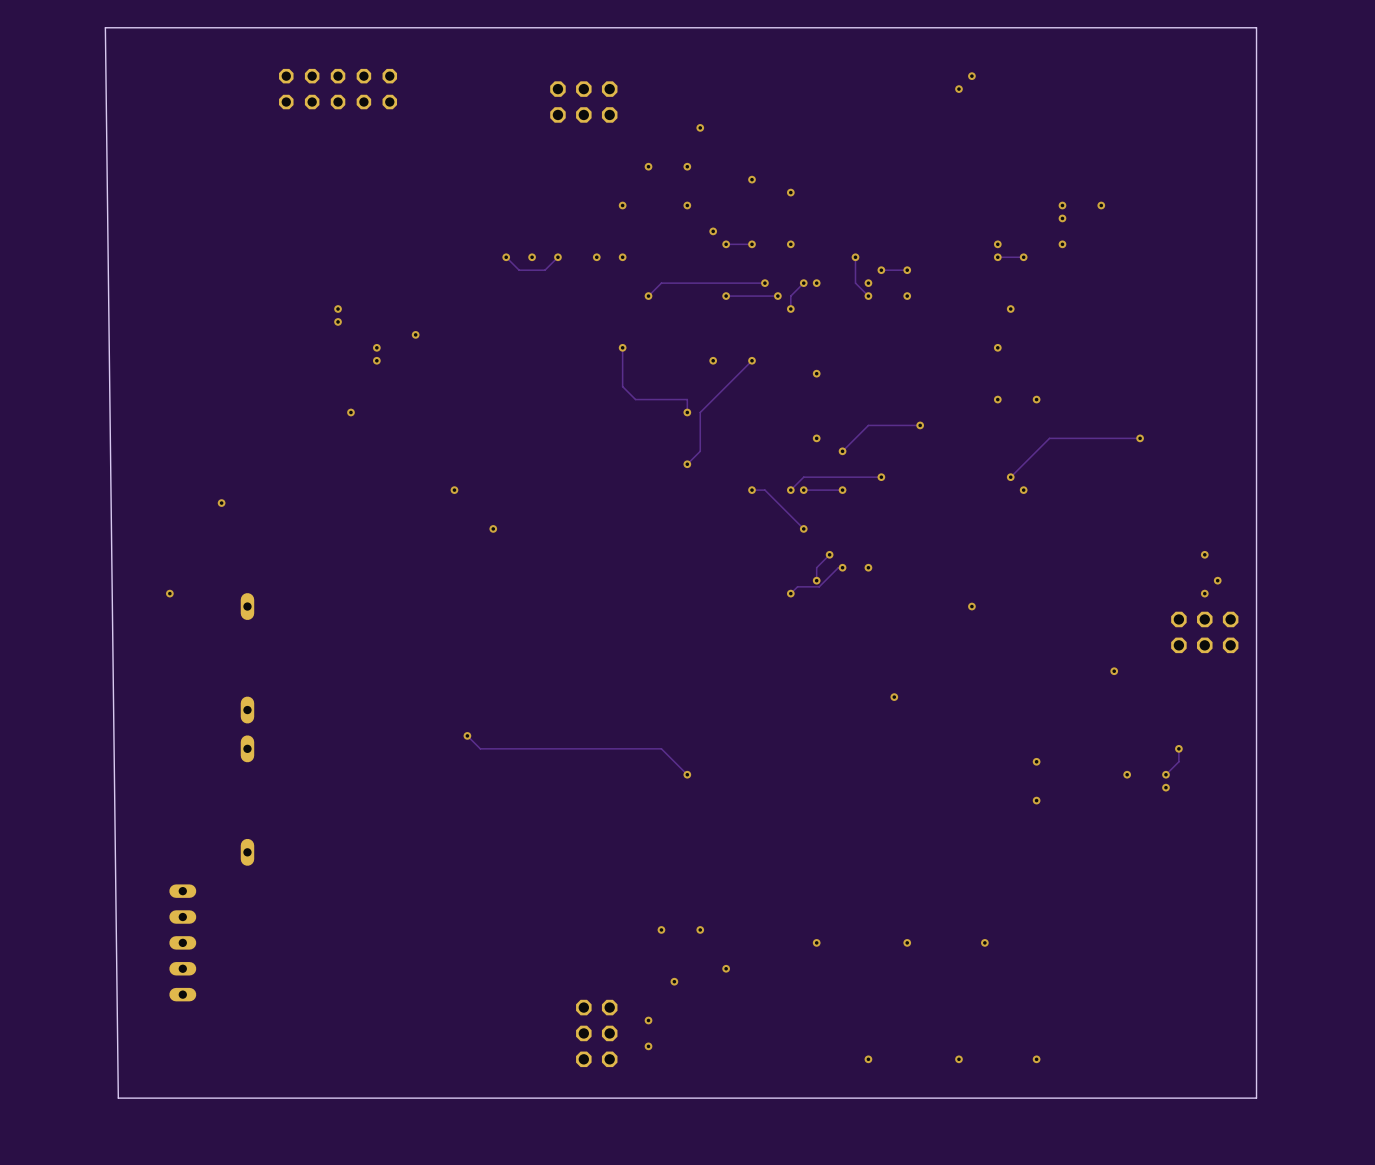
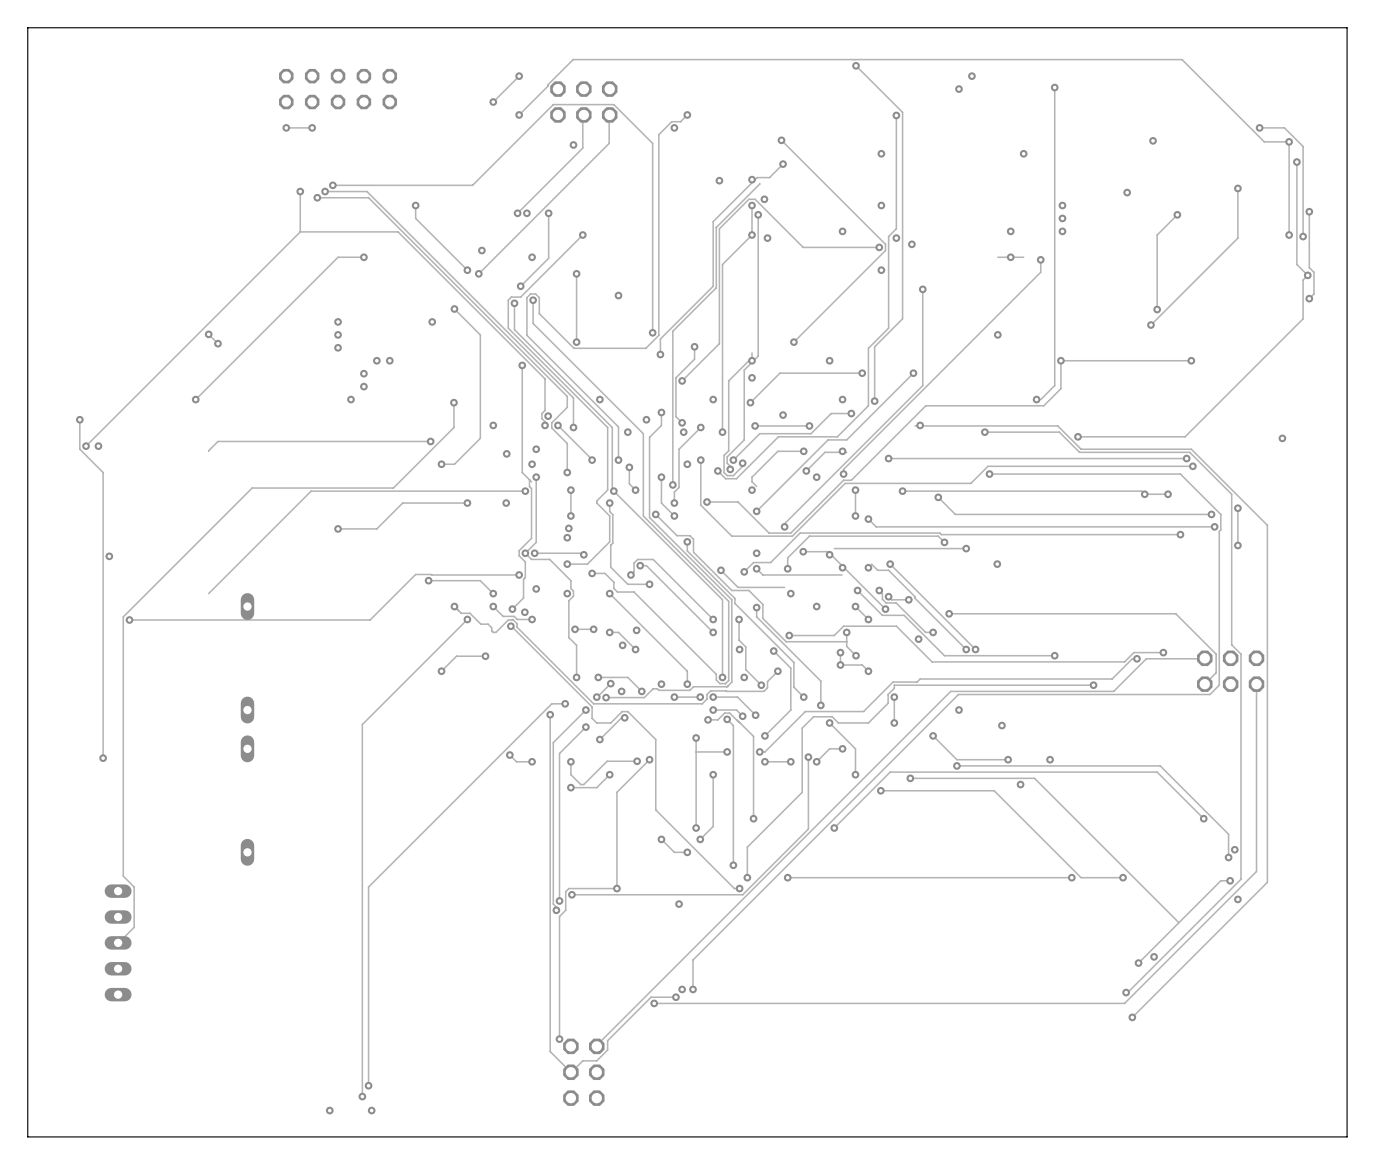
board edge: (1256, 27) (1256, 1098) (118, 1098) (105, 27) -> (1256, 27) (1347, 27) (1347, 1136) (27, 1136) (27, 27) (105, 27)
track: none -> (856, 65) (902, 112) (902, 318) (874, 346) (874, 401)
via: none -> (856, 65)
track: none -> (519, 76) (493, 102)
via: none -> (519, 76)
track: none -> (1054, 87) (1054, 385) (1040, 399)
via: none -> (1054, 87)
via: none -> (493, 102)
track: none -> (519, 114) (573, 59) (1182, 59) (1264, 141) (1289, 141) (1289, 235)
via: none -> (519, 114)
track: none -> (583, 114) (582, 148) (517, 213)
track: none -> (609, 114) (609, 143) (478, 273)
track: none -> (687, 114) (680, 121) (671, 121) (658, 134) (658, 335) (645, 348) (574, 348) (539, 313) (539, 297) (535, 294) (530, 294) (526, 297) (526, 335) (618, 426) (618, 460)
via: none -> (687, 114)
track: none -> (896, 115) (896, 228) (888, 236) (888, 328) (868, 348) (868, 405) (837, 436) (778, 436) (736, 478) (725, 478) (717, 470)
via: none -> (896, 115)
via: none -> (286, 127)
track: none -> (312, 127) (286, 127)
via: none -> (312, 127)
via: none -> (674, 127)
via: (700, 127) -> none
track: none -> (1259, 127) (1284, 127) (1303, 146) (1303, 236)
via: none -> (1259, 127)
track: none -> (781, 140) (885, 244) (885, 250) (793, 342)
via: none -> (781, 140)
via: none -> (1153, 140)
via: none -> (1289, 141)
via: none -> (573, 144)
via: none -> (881, 153)
via: none -> (1023, 153)
track: none -> (1296, 162) (1296, 264) (1307, 275) (1303, 280) (1303, 318) (1185, 436) (1078, 436)
via: none -> (1296, 162)
track: none -> (783, 164) (769, 177) (757, 177) (713, 221) (713, 286) (660, 339) (660, 354)
via: none -> (783, 164)
via: (648, 166) -> none
via: (687, 166) -> none
via: none -> (719, 180)
track: none -> (759, 183) (716, 227)
track: none -> (332, 185) (472, 185) (553, 104) (613, 104) (652, 143) (652, 332)
via: none -> (332, 185)
track: none -> (1237, 188) (1237, 238) (1150, 325)
via: none -> (1237, 188)
track: none -> (300, 191) (300, 231)
via: none -> (300, 191)
track: none -> (325, 191) (367, 191) (573, 398) (573, 427)
via: none -> (325, 191)
via: (790, 192) -> none
via: none -> (1127, 192)
track: none -> (317, 197) (368, 197) (567, 396) (567, 407) (551, 422) (551, 427) (567, 443) (567, 472)
via: none -> (317, 197)
via: none -> (764, 199)
track: none -> (415, 205) (415, 218) (467, 270)
via: none -> (415, 205)
via: (622, 205) -> none
via: (687, 205) -> none
track: none -> (752, 205) (752, 235) (722, 264) (722, 432)
via: none -> (752, 205)
via: none -> (881, 205)
via: (1101, 205) -> none
track: none -> (1309, 211) (1309, 267) (1313, 272) (1313, 294) (1309, 298)
via: none -> (1309, 211)
via: none -> (517, 213)
via: none -> (526, 213)
track: none -> (548, 213) (548, 258) (520, 286)
via: none -> (548, 213)
track: none -> (758, 214) (758, 356) (744, 370) (744, 439) (727, 456) (727, 463) (730, 469)
via: none -> (758, 214)
track: none -> (1177, 214) (1157, 235) (1157, 309)
via: none -> (1177, 214)
track: none -> (716, 227) (716, 287) (672, 331) (672, 484)
track: none -> (300, 231) (86, 446)
track: none -> (300, 231) (398, 231) (545, 378) (545, 410) (541, 413) (545, 425)
via: (713, 231) -> none
via: none -> (842, 231)
via: none -> (1010, 231)
track: none -> (582, 235) (520, 297) (511, 297) (508, 300) (508, 328) (607, 427) (607, 490) (596, 503) (609, 515) (609, 541) (587, 564) (567, 564)
via: none -> (582, 235)
via: none -> (752, 235)
via: none -> (1289, 235)
via: none -> (1303, 236)
via: none -> (767, 238)
via: none -> (896, 238)
via: (726, 244) -> none
track: (752, 244) (726, 244) -> none
via: (752, 244) -> none
via: (790, 244) -> none
via: none -> (911, 244)
via: (997, 244) -> none
via position: (1062, 244) -> (1062, 231)
track: none -> (879, 247) (803, 247) (755, 199) (748, 199) (719, 228) (719, 343) (682, 380)
via: none -> (879, 247)
via: none -> (481, 250)
track: none -> (363, 257) (338, 257) (195, 399)
via: none -> (363, 257)
via: (506, 257) -> none
track: (557, 257) (545, 270) (519, 270) (506, 257) -> none
via: (557, 257) -> none
via: (596, 257) -> none
via: (622, 257) -> none
track: (855, 257) (855, 283) (868, 296) -> none
via: (855, 257) -> none
via: (997, 257) -> none
via: none -> (1010, 257)
via: (1023, 257) -> none
track: none -> (1040, 259) (1040, 272) (843, 469) (843, 474)
via: none -> (1040, 259)
via: none -> (467, 270)
track: (907, 270) (881, 270) -> none
via: (907, 270) -> none
via: none -> (478, 273)
track: none -> (576, 273) (576, 342)
via: none -> (576, 273)
via: none -> (1307, 275)
track: (764, 283) (661, 283) (648, 296) -> none
via: (764, 283) -> none
track: (803, 283) (790, 296) (790, 309) -> none
via: (803, 283) -> none
via: (816, 283) -> none
via: (868, 283) -> none
via: none -> (520, 286)
track: none -> (922, 289) (922, 385) (784, 523) (784, 526)
via: none -> (922, 289)
via: none -> (618, 295)
via: (648, 296) -> none
via: (726, 296) -> none
track: (777, 296) (726, 296) -> none
via: (777, 296) -> none
via: (868, 296) -> none
via: (907, 296) -> none
via: none -> (1309, 298)
track: none -> (533, 300) (533, 323) (643, 433) (643, 515) (728, 601) (728, 680) (725, 683) (719, 683) (716, 679) (716, 674) (633, 592) (617, 592) (613, 588) (613, 582) (605, 573) (592, 573)
via: none -> (533, 300)
track: none -> (514, 303) (514, 329) (612, 427) (612, 489) (722, 599) (722, 677)
via: none -> (514, 303)
via: (338, 309) -> none
track: none -> (454, 309) (480, 334) (480, 438) (454, 464) (441, 464)
via: none -> (454, 309)
via: (790, 309) -> none
via: (1010, 309) -> none
via: none -> (1157, 309)
via: none -> (432, 321)
via: none -> (1150, 325)
via: none -> (652, 332)
track: none -> (208, 334) (217, 343)
via: none -> (208, 334)
via: none -> (338, 334)
via: (415, 334) -> none
via: none -> (576, 342)
via: none -> (793, 342)
via: none -> (217, 343)
track: none -> (694, 346) (694, 359) (675, 377) (675, 416) (682, 422)
via: none -> (694, 346)
via: none -> (338, 347)
via: (376, 347) -> none
track: (622, 347) (622, 386) (635, 399) (687, 399) (687, 412) -> none
via: (622, 347) -> none
via position: (997, 347) -> (997, 334)
track: none -> (752, 352) (752, 357) (728, 380) (728, 450) (724, 455) (724, 472) (727, 475) (733, 475) (742, 466) (742, 463)
via: none -> (660, 354)
via: none -> (389, 360)
via: (713, 360) -> none
track: (752, 360) (700, 412) (700, 451) (687, 464) -> none
via: none -> (829, 360)
via: none -> (1060, 360)
track: none -> (1191, 360) (1060, 360) (1060, 388) (1043, 405) (925, 405) (851, 480) (843, 480) (790, 533) (769, 533) (738, 502) (706, 502)
via: none -> (1191, 360)
track: none -> (522, 365) (522, 472) (531, 481)
via: none -> (522, 365)
via: none -> (363, 373)
via: (816, 373) -> none
track: none -> (862, 373) (779, 373) (750, 402)
via: none -> (862, 373)
track: none -> (913, 373) (846, 439) (828, 439) (756, 511)
via: none -> (913, 373)
via: none -> (752, 377)
via: none -> (682, 380)
via: none -> (363, 386)
via: none -> (195, 399)
via: none -> (599, 399)
via: none -> (713, 399)
via: none -> (842, 399)
via: (997, 399) -> none
via: none -> (874, 401)
track: none -> (453, 402) (453, 427) (393, 488) (252, 488) (123, 616) (123, 876) (134, 887) (134, 927) (118, 942)
via: none -> (453, 402)
via: none -> (750, 402)
via position: (350, 412) -> (350, 399)
track: none -> (661, 412) (661, 425) (649, 437) (649, 517) (731, 599) (731, 682) (727, 686)
via: none -> (661, 412)
via: (687, 412) -> none
track: none -> (851, 413) (831, 413) (810, 433) (759, 433) (733, 460)
via: none -> (851, 413)
via: none -> (783, 415)
via: none -> (548, 416)
track: none -> (79, 419) (79, 449) (103, 472) (103, 758)
via: none -> (79, 419)
via: none -> (646, 419)
via: none -> (682, 422)
via: none -> (493, 425)
via: none -> (545, 425)
track: none -> (557, 425) (592, 460)
via: none -> (557, 425)
via: none -> (755, 425)
track: none -> (809, 425) (755, 425)
via: none -> (809, 425)
track: none -> (915, 425) (1057, 425) (1081, 449) (1191, 449) (1267, 525) (1267, 882) (1132, 1017)
track: (920, 425) (868, 425) (842, 451) -> none
via: none -> (573, 427)
track: none -> (700, 427) (679, 449) (679, 487) (674, 492) (674, 503)
via: none -> (700, 427)
via: none -> (627, 432)
via: none -> (683, 432)
via: none -> (722, 432)
track: none -> (984, 432) (1059, 432) (1079, 452) (1189, 452) (1231, 494) (1231, 644) (1241, 654) (1241, 879) (1126, 992)
via: none -> (984, 432)
via: none -> (1078, 436)
via: (816, 438) -> none
track: (1140, 438) (1049, 438) (1010, 477) -> none
via: (1140, 438) -> none
via: none -> (1282, 438)
track: none -> (430, 441) (217, 441) (208, 451)
via: none -> (430, 441)
via: none -> (86, 446)
via: none -> (98, 446)
via: none -> (536, 449)
track: none -> (803, 451) (777, 451) (752, 477) (752, 481) (756, 486)
via: none -> (803, 451)
track: none -> (846, 452) (824, 452) (806, 470)
via: none -> (506, 453)
via: none -> (888, 458)
track: none -> (1186, 458) (888, 458)
via: none -> (1186, 458)
via: none -> (592, 460)
via: none -> (618, 460)
track: none -> (700, 460) (700, 505) (731, 536) (792, 536) (845, 483) (970, 483) (987, 466) (1192, 466)
via: none -> (700, 460)
via: none -> (733, 460)
via: none -> (742, 463)
via: none -> (441, 464)
via: none -> (532, 464)
via: none -> (1192, 466)
track: none -> (629, 467) (629, 483) (635, 490)
via: none -> (629, 467)
via: none -> (730, 469)
via: none -> (717, 470)
via: none -> (806, 470)
via: none -> (567, 472)
via: none -> (843, 474)
track: none -> (989, 474) (1180, 474) (1220, 514) (1219, 685) (1209, 694) (958, 694) (693, 959) (693, 989)
via: none -> (989, 474)
track: none -> (536, 477) (536, 542) (525, 553) (531, 559) (549, 559) (570, 580) (573, 596) (568, 600) (568, 637) (576, 645) (576, 677)
via: none -> (536, 477)
track: none -> (661, 477) (661, 503) (674, 515)
via: none -> (661, 477)
via: none -> (816, 477)
track: (881, 477) (803, 477) (790, 490) -> none
via: (881, 477) -> none
via: (1010, 477) -> none
track: none -> (529, 479) (529, 486) (531, 488) (531, 538) (519, 550) (519, 555) (525, 561) (523, 598) (512, 609)
via: none -> (672, 484)
via: (454, 490) -> none
track: none -> (570, 490) (570, 515)
via: none -> (570, 490)
via: none -> (635, 490)
track: (752, 490) (764, 490) (803, 528) -> none
via: (790, 490) -> none
via: (803, 490) -> none
track: (842, 490) (803, 490) -> none
via: (842, 490) -> none
track: none -> (855, 490) (855, 515)
via: none -> (855, 490)
via: (1023, 490) -> none
track: none -> (525, 491) (311, 491) (208, 593)
via: none -> (525, 491)
via: none -> (613, 491)
track: none -> (902, 491) (1141, 491) (1144, 494) (1168, 494)
via: none -> (902, 491)
via: none -> (1144, 494)
via: none -> (1168, 494)
track: none -> (938, 497) (955, 514) (1211, 514)
via: none -> (938, 497)
via: none -> (706, 502)
via: (221, 503) -> none
track: none -> (467, 503) (402, 503) (376, 528) (338, 528)
via: none -> (467, 503)
via: none -> (506, 503)
track: none -> (609, 503) (609, 511) (612, 514) (610, 567) (627, 584) (649, 584)
via: none -> (609, 503)
via: none -> (674, 503)
track: none -> (1237, 508) (1237, 545)
via: none -> (1237, 508)
via: none -> (756, 511)
track: none -> (655, 514) (677, 535) (689, 535) (693, 539) (693, 552) (731, 590) (748, 590) (762, 604) (762, 618) (786, 641) (846, 641)
via: none -> (655, 514)
via: none -> (1211, 514)
via: none -> (570, 515)
via: none -> (674, 515)
via: none -> (855, 515)
track: none -> (868, 519) (876, 526) (1214, 526)
via: none -> (868, 519)
via: none -> (784, 526)
via: none -> (1214, 526)
via: none -> (338, 528)
via: (493, 528) -> none
via: none -> (568, 528)
via: (803, 528) -> none
track: none -> (1180, 534) (800, 533) (770, 562) (753, 562) (744, 571)
via: none -> (1180, 534)
via: none -> (567, 537)
track: none -> (687, 541) (687, 550) (734, 598) (734, 603) (793, 662) (793, 687) (803, 697)
via: none -> (687, 541)
track: none -> (944, 542) (938, 536) (809, 536) (787, 557) (787, 568)
via: none -> (944, 542)
via: none -> (1237, 545)
track: none -> (966, 548) (834, 548)
via: none -> (966, 548)
track: none -> (803, 551) (828, 551) (885, 609)
via: none -> (803, 551)
via: none -> (525, 553)
track: none -> (534, 553) (582, 553) (583, 554)
via: none -> (534, 553)
via: none -> (756, 553)
via: none -> (583, 554)
track: (829, 554) (816, 567) (816, 580) -> none
via: (1204, 554) -> none
via: none -> (109, 556)
via: none -> (567, 564)
track: none -> (871, 564) (877, 570) (888, 570) (966, 649)
track: none -> (890, 564) (975, 649)
via: none -> (890, 564)
via: none -> (997, 564)
track: none -> (640, 565) (646, 565) (713, 632)
via: none -> (640, 565)
track: (842, 567) (838, 567) (819, 586) (797, 586) (790, 593) -> none
track: none -> (756, 568) (762, 574) (842, 574)
via: none -> (756, 568)
via: none -> (787, 568)
track: none -> (720, 570) (738, 587) (784, 587)
via: none -> (720, 570)
via: none -> (744, 571)
via: none -> (592, 573)
track: none -> (519, 574) (415, 574) (370, 619) (129, 619)
via: none -> (519, 574)
track: none -> (630, 574) (634, 571) (634, 563) (637, 559) (653, 559) (713, 619)
via: none -> (630, 574)
track: none -> (428, 580) (480, 580) (493, 593)
via: none -> (428, 580)
via: (816, 580) -> none
via: (1217, 580) -> none
via: none -> (649, 584)
via: none -> (536, 588)
track: none -> (857, 590) (882, 615) (904, 615) (944, 655) (1054, 655)
via: none -> (857, 590)
track: none -> (879, 590) (886, 602) (896, 602) (925, 632) (933, 632)
via: none -> (879, 590)
via: (169, 593) -> none
via: none -> (493, 593)
via: none -> (567, 593)
track: none -> (609, 593) (687, 671) (687, 684)
via: none -> (609, 593)
via: (1204, 593) -> none
track: none -> (888, 596) (891, 599) (908, 599)
via: none -> (888, 596)
via: none -> (908, 599)
track: none -> (454, 606) (461, 613) (469, 613) (480, 624) (488, 624) (493, 632) (495, 632) (508, 620) (512, 619) (517, 623) (517, 627) (593, 703) (702, 703) (710, 690) (763, 691) (767, 687) (767, 681) (777, 671)
via: none -> (454, 606)
track: none -> (493, 606) (503, 616) (514, 616) (517, 619) (532, 619)
via: none -> (493, 606)
via: none -> (816, 606)
track: none -> (855, 606) (868, 619)
via: none -> (855, 606)
via: (971, 606) -> none
track: none -> (756, 607) (756, 616) (820, 681) (820, 705)
via: none -> (756, 607)
via: none -> (512, 609)
via: none -> (885, 609)
via: none -> (524, 612)
track: none -> (949, 613) (1175, 613) (1216, 654) (1216, 672) (1204, 684)
via: none -> (949, 613)
via: none -> (129, 619)
track: none -> (467, 619) (362, 724) (362, 1096)
via: none -> (467, 619)
via: none -> (532, 619)
via: none -> (713, 619)
track: none -> (739, 619) (739, 640) (745, 646) (745, 669) (761, 685)
via: none -> (739, 619)
via: none -> (868, 619)
track: none -> (510, 626) (592, 706) (592, 718) (596, 722) (610, 722) (622, 711) (627, 711) (655, 739) (655, 809) (734, 888) (739, 888)
via: none -> (510, 626)
via: none -> (575, 629)
track: none -> (593, 629) (575, 629)
via: none -> (593, 629)
via: none -> (636, 630)
track: none -> (609, 632) (618, 632) (635, 649)
via: none -> (609, 632)
via: none -> (713, 632)
track: none -> (846, 632) (846, 646) (856, 655)
via: none -> (846, 632)
via: none -> (933, 632)
part position: (1204, 632) -> (1230, 671)
track: none -> (789, 635) (834, 635) (843, 626) (896, 626) (932, 661) (1124, 661) (1133, 652) (1163, 652)
via: none -> (789, 635)
via: none -> (918, 639)
via: none -> (622, 645)
via: none -> (635, 649)
via: none -> (739, 649)
via: none -> (966, 649)
via: none -> (975, 649)
track: none -> (773, 651) (790, 668) (790, 710) (764, 735)
via: none -> (773, 651)
track: none -> (840, 652) (840, 665) (862, 665) (868, 671)
via: none -> (840, 652)
via: none -> (1163, 652)
via: none -> (856, 655)
via: none -> (1054, 655)
track: none -> (485, 656) (456, 656) (441, 671)
via: none -> (485, 656)
track: none -> (1136, 658) (1132, 658) (1112, 678) (920, 678) (917, 682) (893, 682) (863, 711) (805, 711) (764, 751) (759, 751)
via: none -> (1136, 658)
track: none -> (1204, 658) (1146, 658) (1113, 691) (950, 691) (596, 1046)
via: none -> (840, 665)
via: none -> (441, 671)
via: none -> (777, 671)
via: none -> (868, 671)
via: (1114, 671) -> none
via: none -> (576, 677)
track: none -> (598, 677) (627, 677) (641, 691)
via: none -> (598, 677)
via: none -> (722, 677)
via: none -> (744, 677)
track: none -> (610, 683) (596, 697)
via: none -> (610, 683)
via: none -> (661, 684)
via: none -> (687, 684)
track: none -> (1256, 684) (1256, 871) (1124, 1003) (654, 1003)
track: none -> (727, 685) (693, 686) (689, 690) (653, 688) (644, 697) (606, 697)
via: none -> (761, 685)
track: none -> (1093, 685) (894, 685) (894, 688) (888, 694) (888, 703) (868, 722) (838, 722) (832, 716) (813, 716) (802, 728) (802, 792) (747, 847) (747, 877)
via: none -> (1093, 685)
via: none -> (621, 691)
via: none -> (641, 691)
via: none -> (596, 697)
via: none -> (606, 697)
via: none -> (674, 697)
track: none -> (700, 697) (674, 697)
via: none -> (700, 697)
track: none -> (713, 697) (737, 697) (755, 715)
via: none -> (713, 697)
via: none -> (803, 697)
track: none -> (894, 697) (894, 722)
track: none -> (565, 703) (551, 703) (368, 887) (368, 1085)
via: none -> (565, 703)
via: none -> (820, 705)
track: none -> (585, 710) (553, 742) (553, 904) (556, 910)
via: none -> (585, 710)
track: none -> (713, 710) (736, 710) (742, 716)
via: none -> (713, 710)
via: none -> (958, 710)
track: none -> (550, 714) (550, 1051) (570, 1072) (582, 1060) (596, 1060) (607, 1050) (607, 1040) (651, 997) (675, 997)
via: none -> (550, 714)
via: none -> (755, 715)
via: none -> (742, 716)
track: none -> (624, 717) (621, 717) (599, 739)
via: none -> (624, 717)
track: none -> (708, 719) (717, 719) (724, 713) (729, 713) (739, 722)
via: none -> (708, 719)
track: none -> (727, 719) (733, 725) (733, 865)
via: none -> (727, 719)
track: none -> (736, 719) (753, 736) (753, 818)
track: none -> (829, 722) (855, 748) (855, 774)
via: none -> (829, 722)
via: none -> (894, 722)
via: none -> (1001, 725)
track: none -> (585, 727) (559, 753) (559, 900)
via: none -> (585, 727)
track: (467, 735) (480, 748) (661, 748) (687, 774) -> none
via: (467, 735) -> none
via: none -> (764, 735)
track: none -> (933, 735) (956, 759) (1008, 759)
via: none -> (933, 735)
track: none -> (696, 737) (696, 828)
via: none -> (696, 737)
via: none -> (599, 739)
track: none -> (842, 748) (829, 748) (816, 761)
via: none -> (842, 748)
track: (1178, 748) (1178, 761) (1165, 774) -> none
via: (1178, 748) -> none
track: none -> (727, 751) (696, 751)
via: none -> (727, 751)
via: none -> (759, 751)
track: none -> (509, 755) (516, 761) (532, 761)
via: none -> (509, 755)
track: none -> (808, 757) (808, 829) (742, 894) (571, 894)
via: none -> (808, 757)
via: none -> (103, 758)
track: none -> (649, 759) (616, 792) (616, 888) (568, 888) (565, 891) (565, 910) (559, 916) (559, 1039)
via: none -> (649, 759)
via: none -> (1008, 759)
via: none -> (532, 761)
via: none -> (570, 761)
track: none -> (637, 761) (607, 761) (583, 784) (580, 784) (570, 774) (570, 761)
via: none -> (637, 761)
via: none -> (764, 761)
track: none -> (790, 761) (764, 761)
via: none -> (790, 761)
via: none -> (816, 761)
via position: (1036, 761) -> (1050, 759)
track: none -> (956, 765) (1160, 765) (1228, 834) (1228, 857)
via: none -> (956, 765)
track: none -> (609, 774) (596, 787) (570, 787)
via: none -> (609, 774)
via: (687, 774) -> none
track: none -> (713, 774) (713, 826) (700, 839)
via: none -> (713, 774)
via: none -> (855, 774)
via: (1127, 774) -> none
via: (1165, 774) -> none
track: none -> (910, 778) (1034, 778) (1178, 922)
via: none -> (910, 778)
via: none -> (1020, 784)
via: none -> (570, 787)
via: (1165, 787) -> none
track: none -> (880, 790) (994, 790) (1081, 877) (1123, 877)
via: none -> (880, 790)
via: (1036, 800) -> none
via: none -> (753, 818)
track: none -> (1203, 818) (1157, 772) (890, 772) (834, 828)
via: none -> (1203, 818)
via: none -> (696, 828)
via: none -> (834, 828)
track: none -> (661, 839) (674, 852) (687, 852)
via: none -> (661, 839)
via: none -> (700, 839)
via: none -> (1234, 849)
via: none -> (687, 852)
via: none -> (1228, 857)
via: none -> (733, 865)
via: none -> (747, 877)
via: none -> (787, 877)
track: none -> (1071, 877) (787, 877)
via: none -> (1071, 877)
via: none -> (1123, 877)
track: none -> (1230, 880) (1220, 880) (1138, 963)
via: none -> (1230, 880)
via: none -> (616, 888)
via: none -> (739, 888)
via: none -> (571, 894)
via: none -> (1237, 899)
via: none -> (559, 900)
via: none -> (679, 904)
via: none -> (556, 910)
via: (661, 929) -> none
via: (700, 929) -> none
part position: (182, 942) -> (118, 942)
via: (816, 942) -> none
via: (907, 942) -> none
via: (984, 942) -> none
via: none -> (1154, 956)
via: none -> (1138, 963)
via: (726, 968) -> none
via: (674, 981) -> none
via: none -> (682, 989)
via: none -> (693, 989)
via: none -> (1126, 992)
via: none -> (675, 997)
via: none -> (654, 1003)
via: none -> (1132, 1017)
via: (648, 1020) -> none
part position: (596, 1033) -> (583, 1072)
via: none -> (559, 1039)
via: (648, 1046) -> none
via: (868, 1059) -> none
via: (958, 1059) -> none
via: (1036, 1059) -> none
via: none -> (368, 1085)
via: none -> (362, 1096)
via: none -> (329, 1110)
via: none -> (371, 1110)

